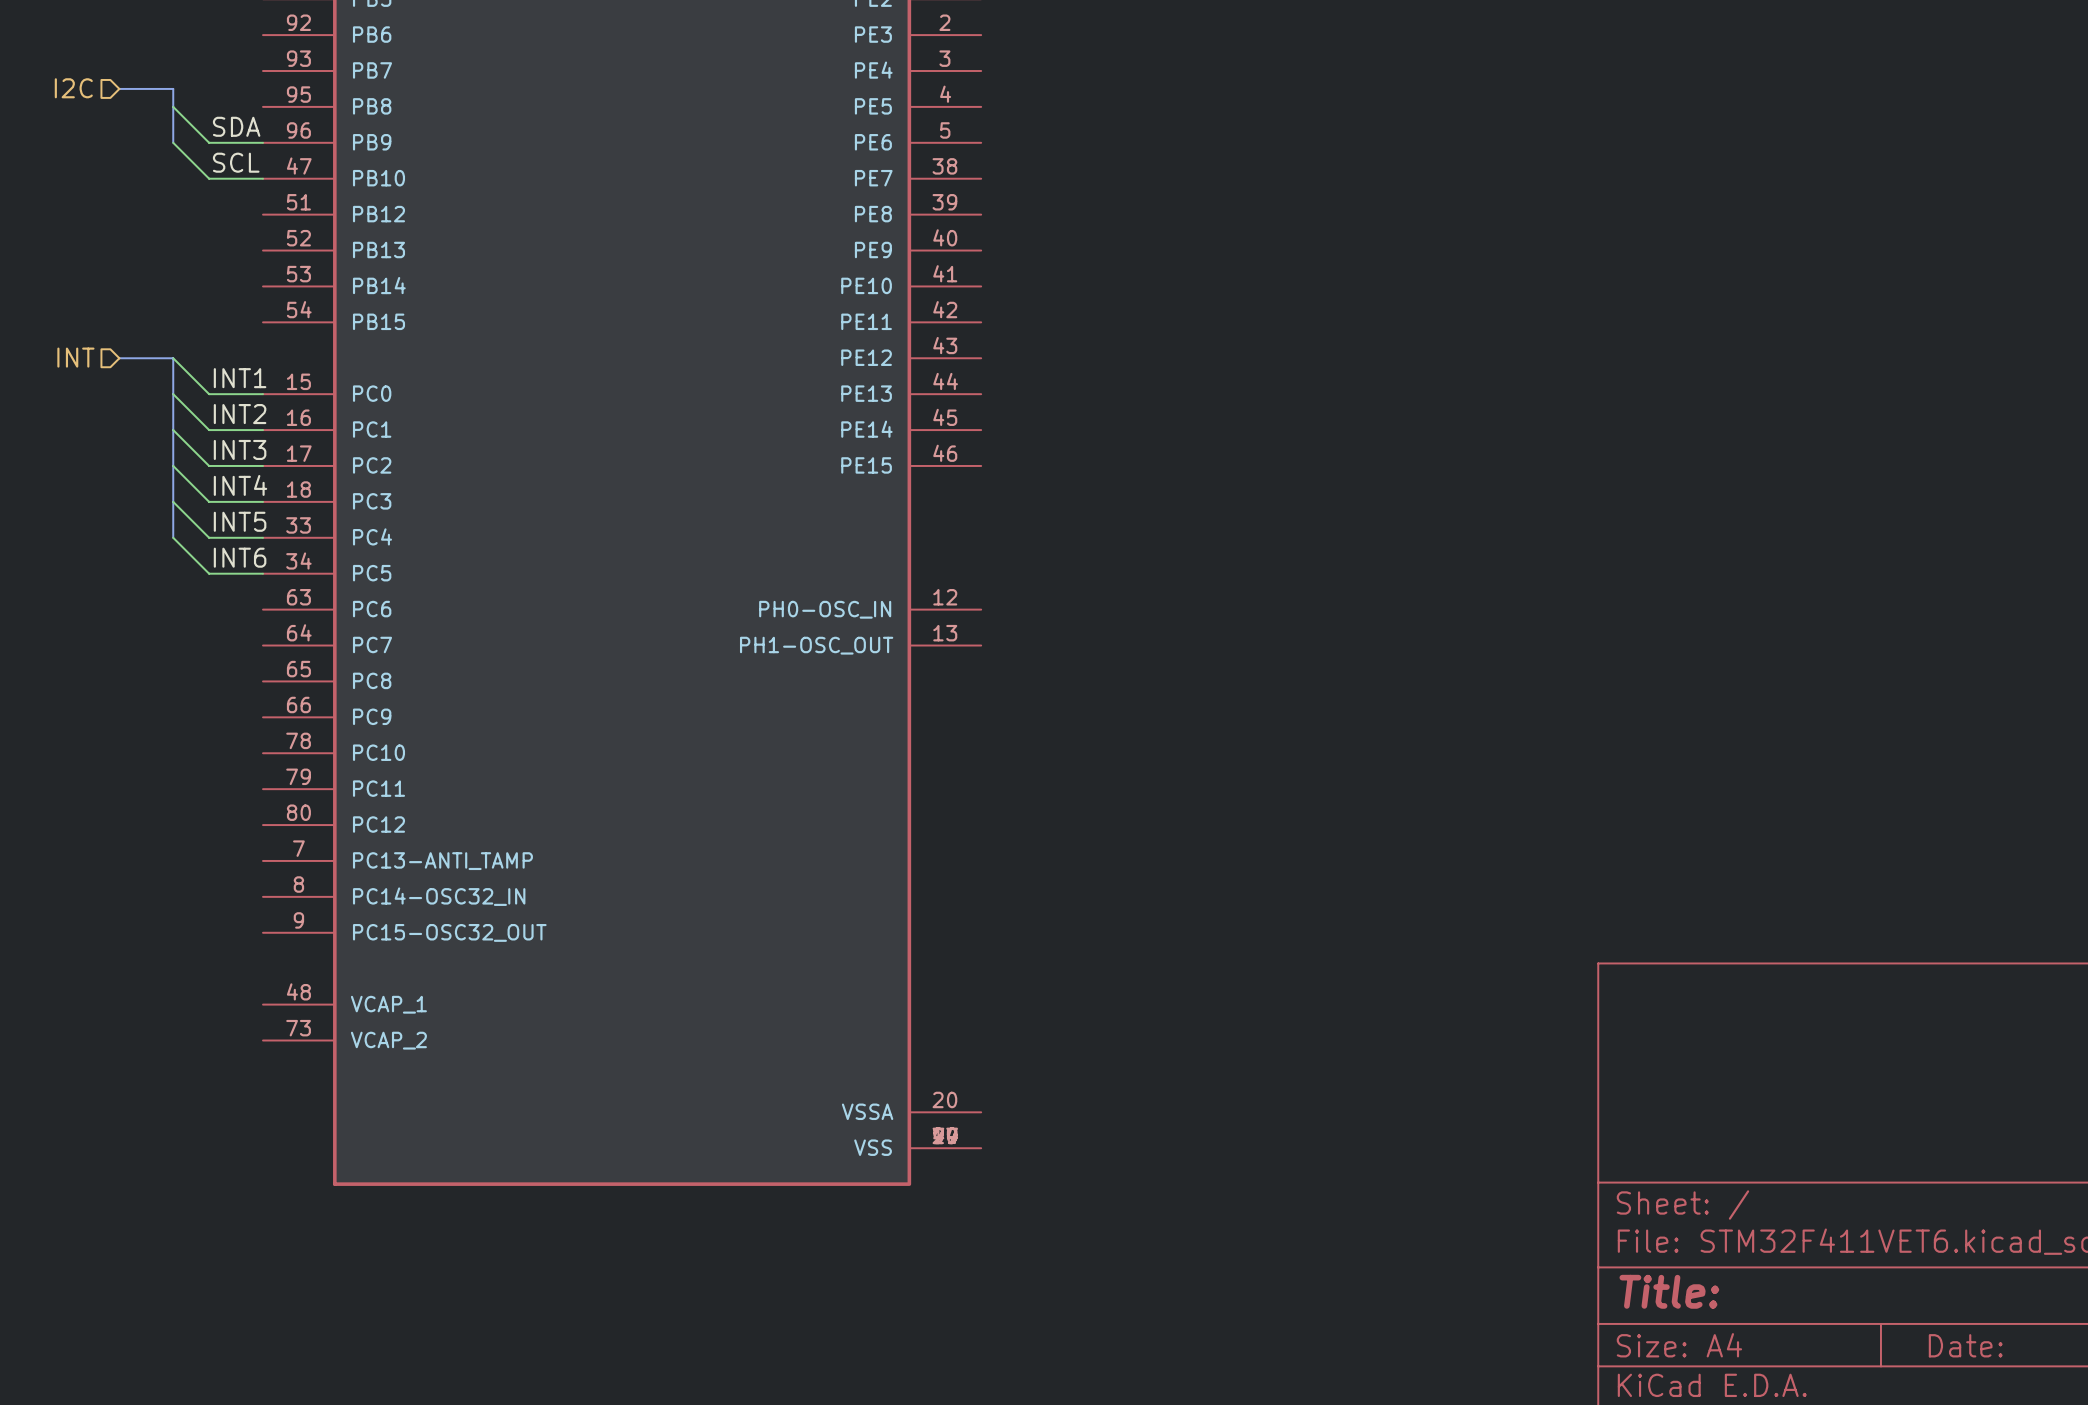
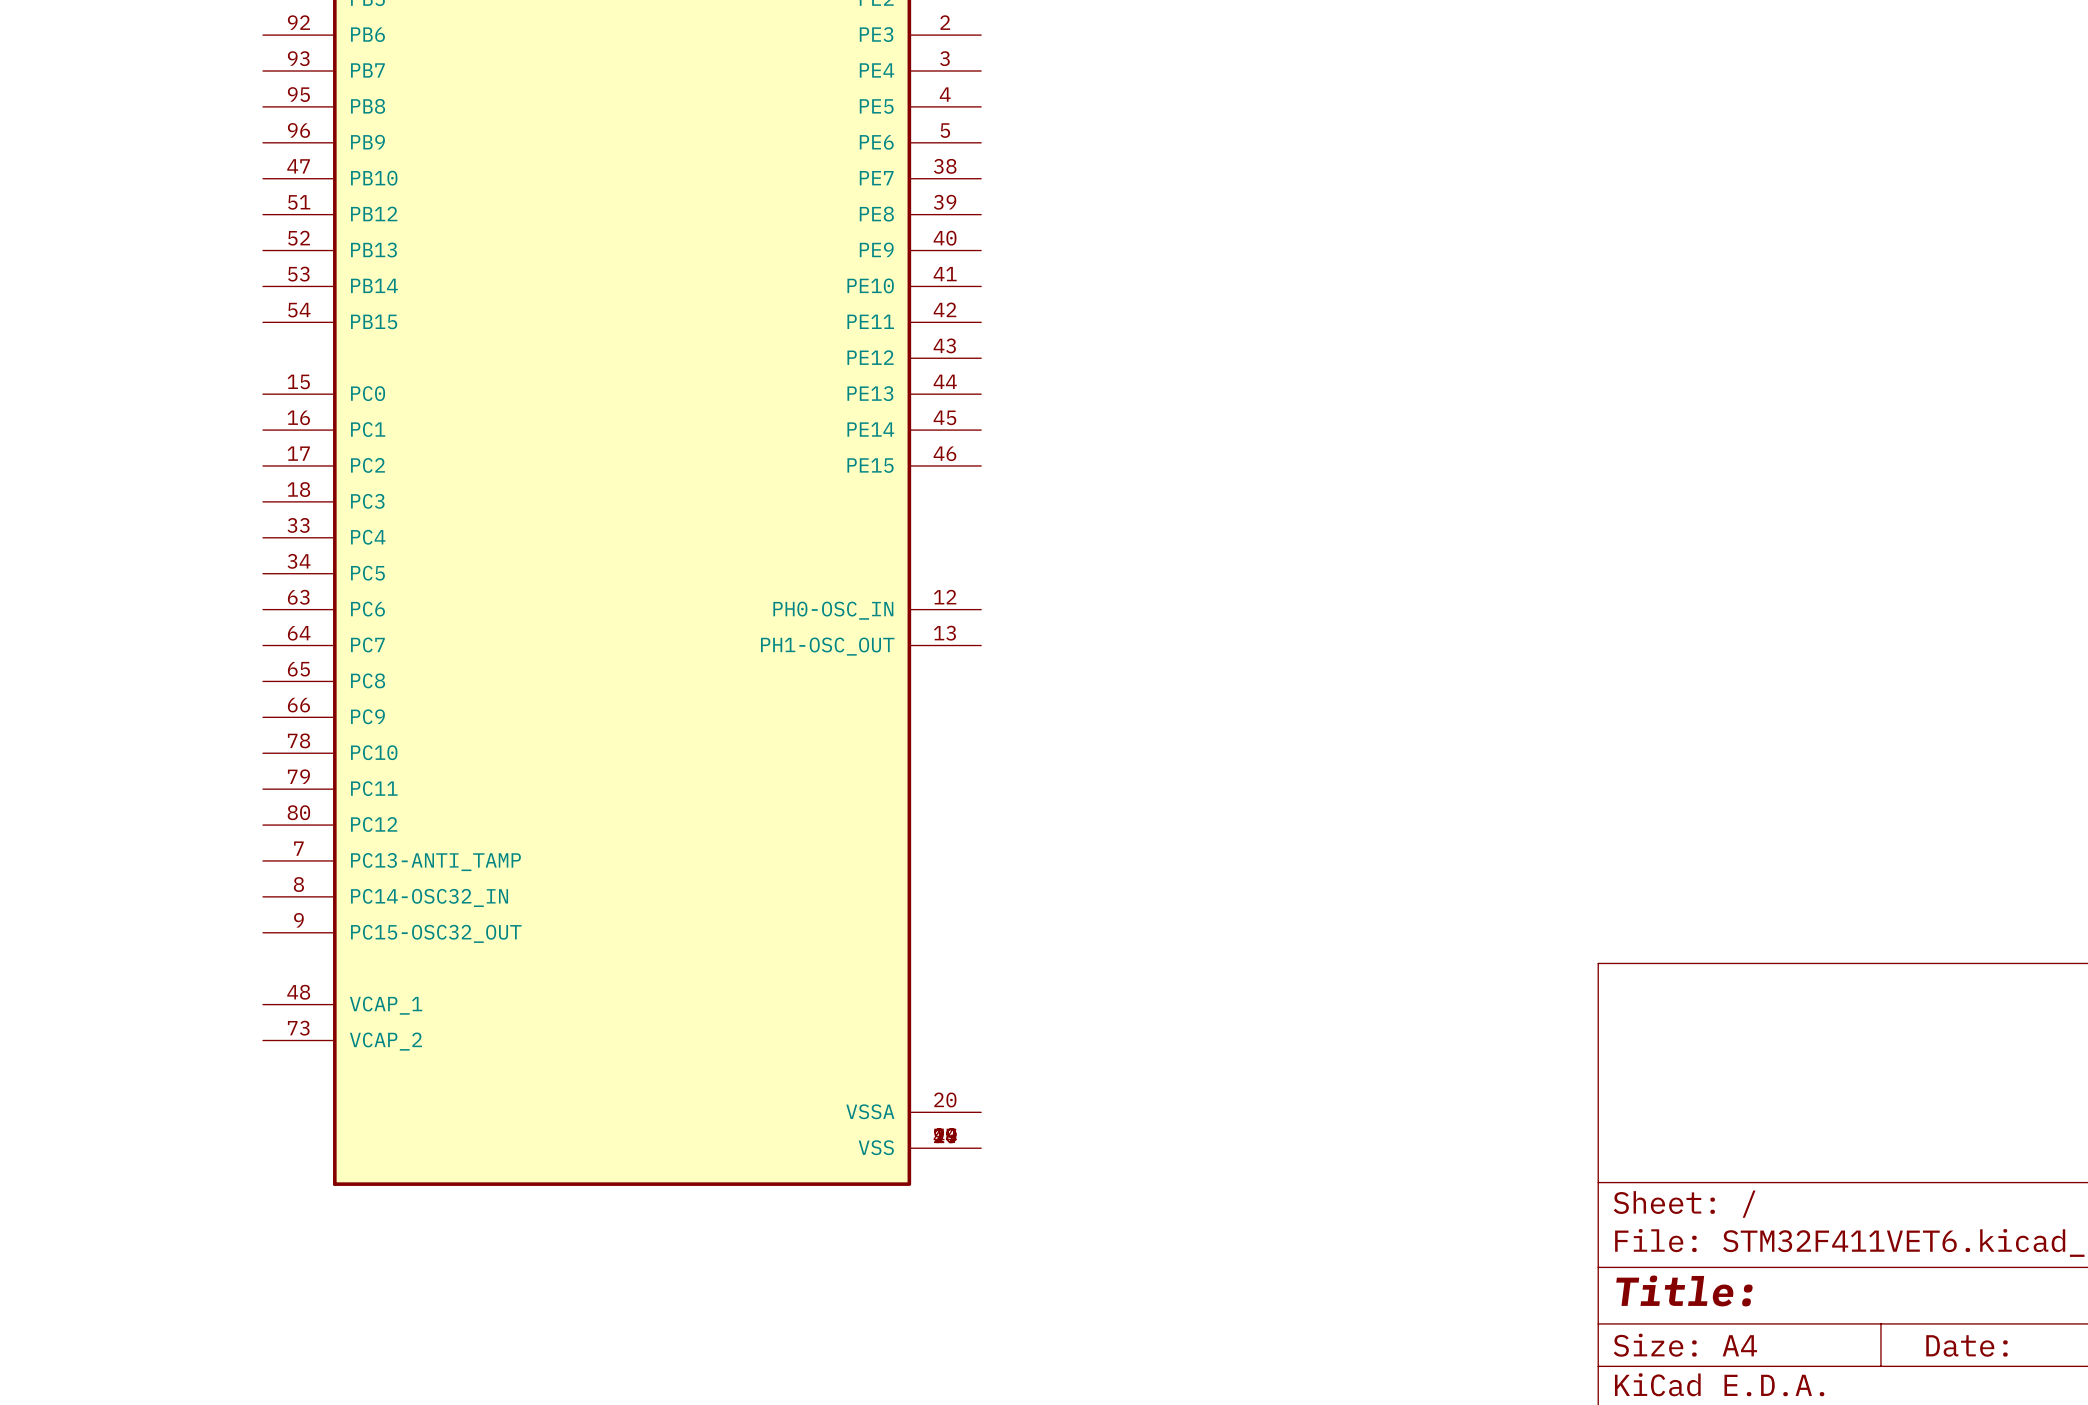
hierarchical label: I2C (73, 88) -> none
bus: (119, 88) (173, 88) (173, 142) -> none
wire: (173, 106) (209, 142) (263, 142) -> none
label: SDA (236, 126) -> none
wire: (173, 142) (209, 178) (263, 178) -> none
label: SCL (236, 162) -> none
hierarchical label: INT (75, 357) -> none
bus: (119, 358) (173, 358) (173, 537) -> none
wire: (173, 358) (209, 394) (263, 394) -> none
label: INT1 (240, 378) -> none
wire: (173, 394) (209, 430) (263, 430) -> none
label: INT2 (240, 414) -> none
wire: (173, 430) (209, 465) (263, 465) -> none
label: INT3 (240, 449) -> none
wire: (173, 465) (209, 501) (263, 501) -> none
label: INT4 (240, 485) -> none
wire: (173, 501) (209, 537) (263, 537) -> none
label: INT5 (240, 521) -> none
wire: (173, 537) (209, 573) (263, 573) -> none
label: INT6 (240, 557) -> none

